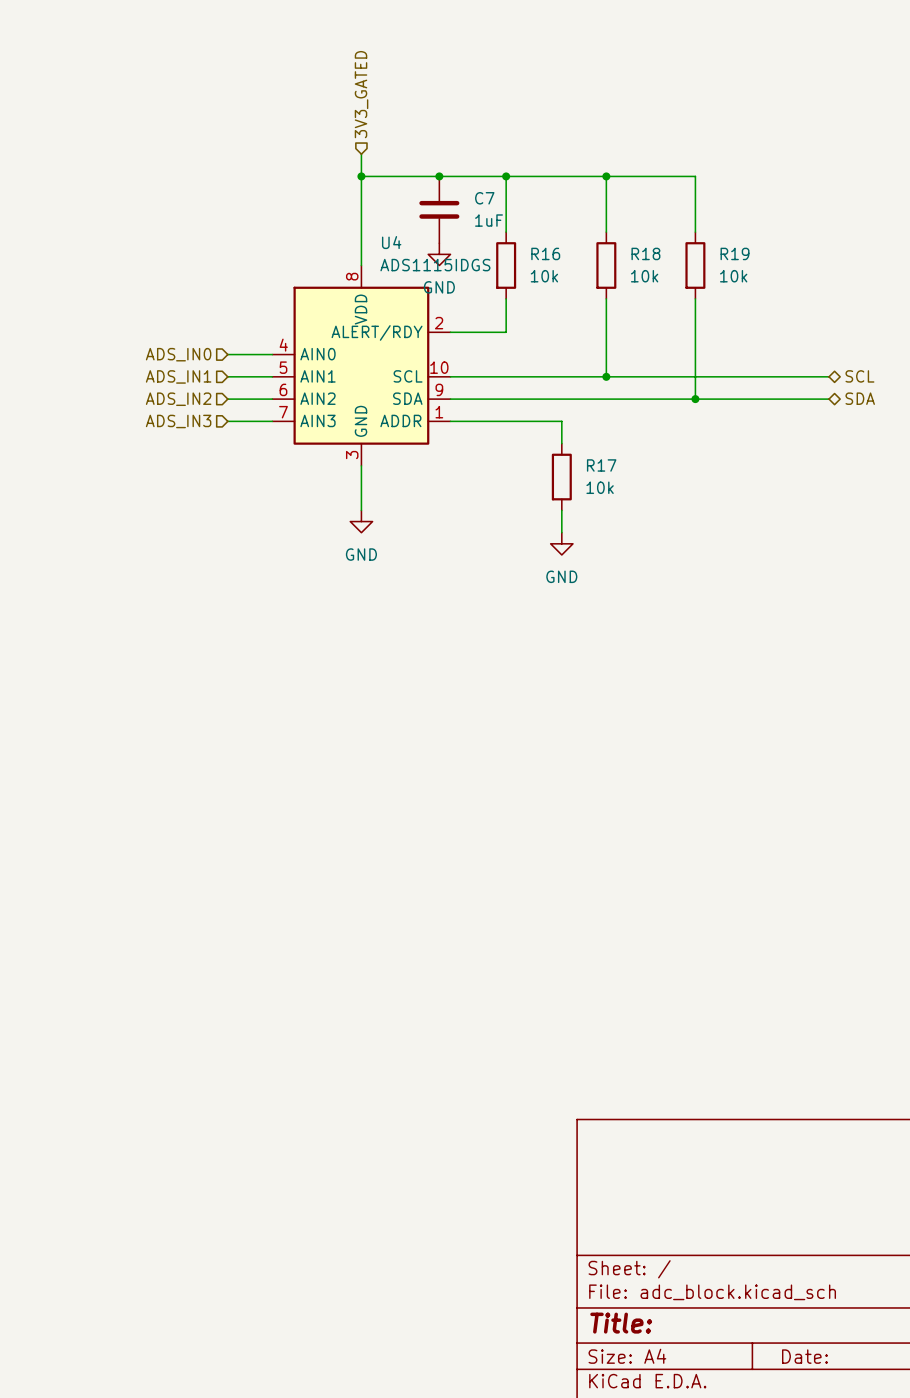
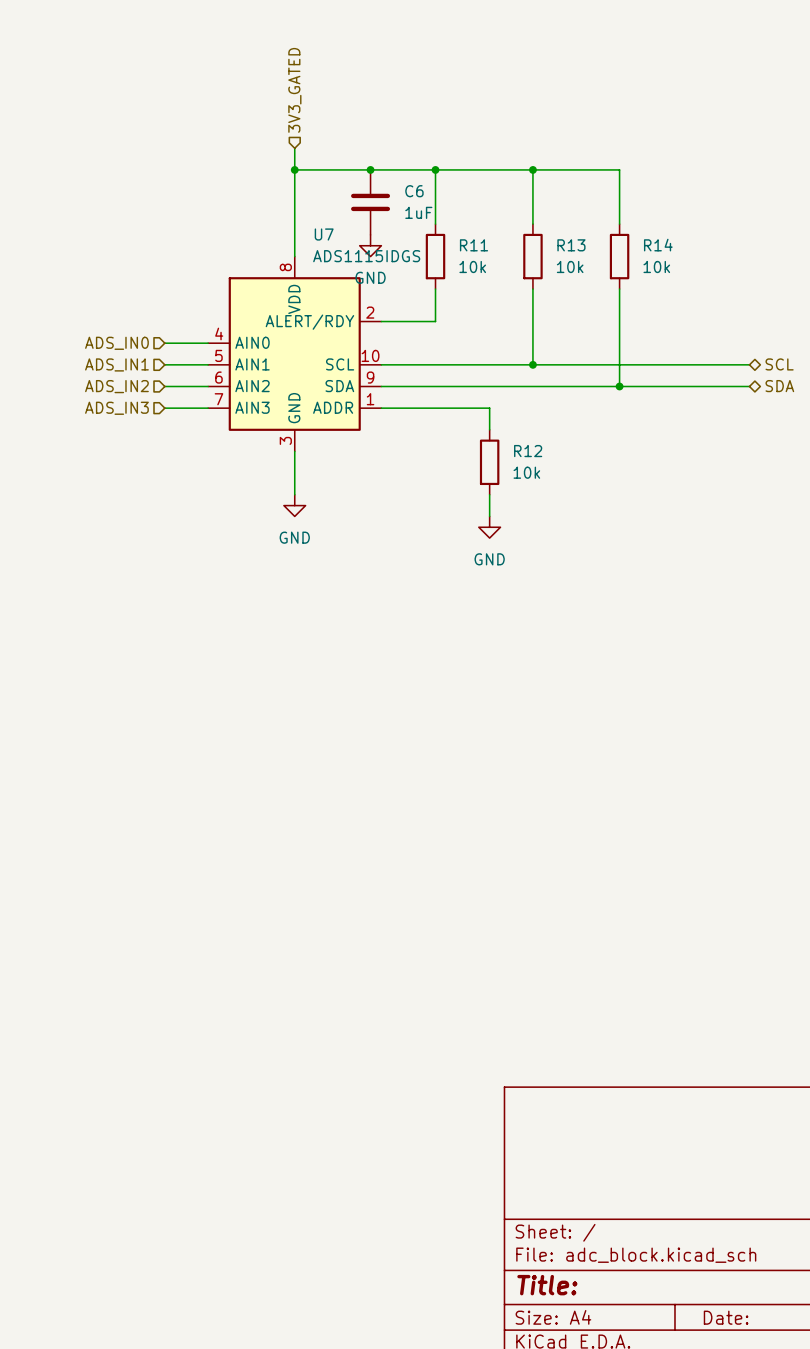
C7 name: C7 (484, 198) -> C6 (414, 191)
U4 name: U4 (391, 242) -> U7 (324, 234)
R16 name: R16 (545, 253) -> R11 (474, 245)
R18 name: R18 (645, 253) -> R13 (571, 245)
R19 name: R19 (735, 253) -> R14 (658, 245)
R17 name: R17 (601, 465) -> R12 (528, 451)

